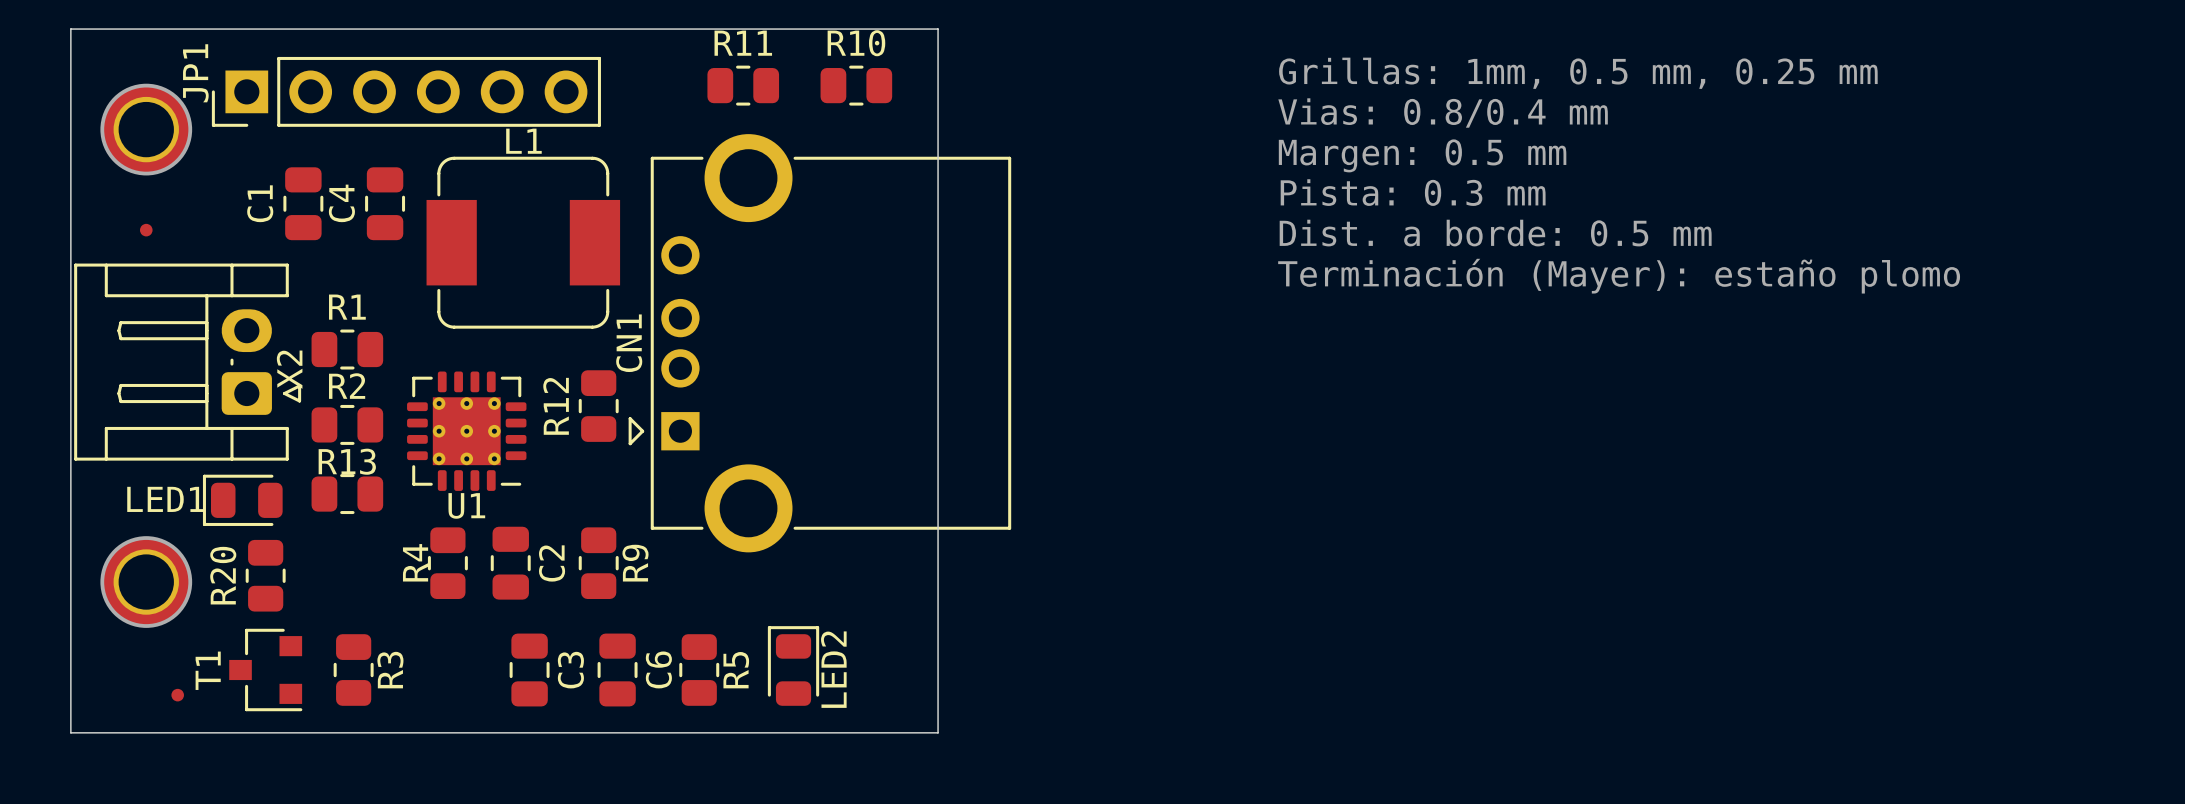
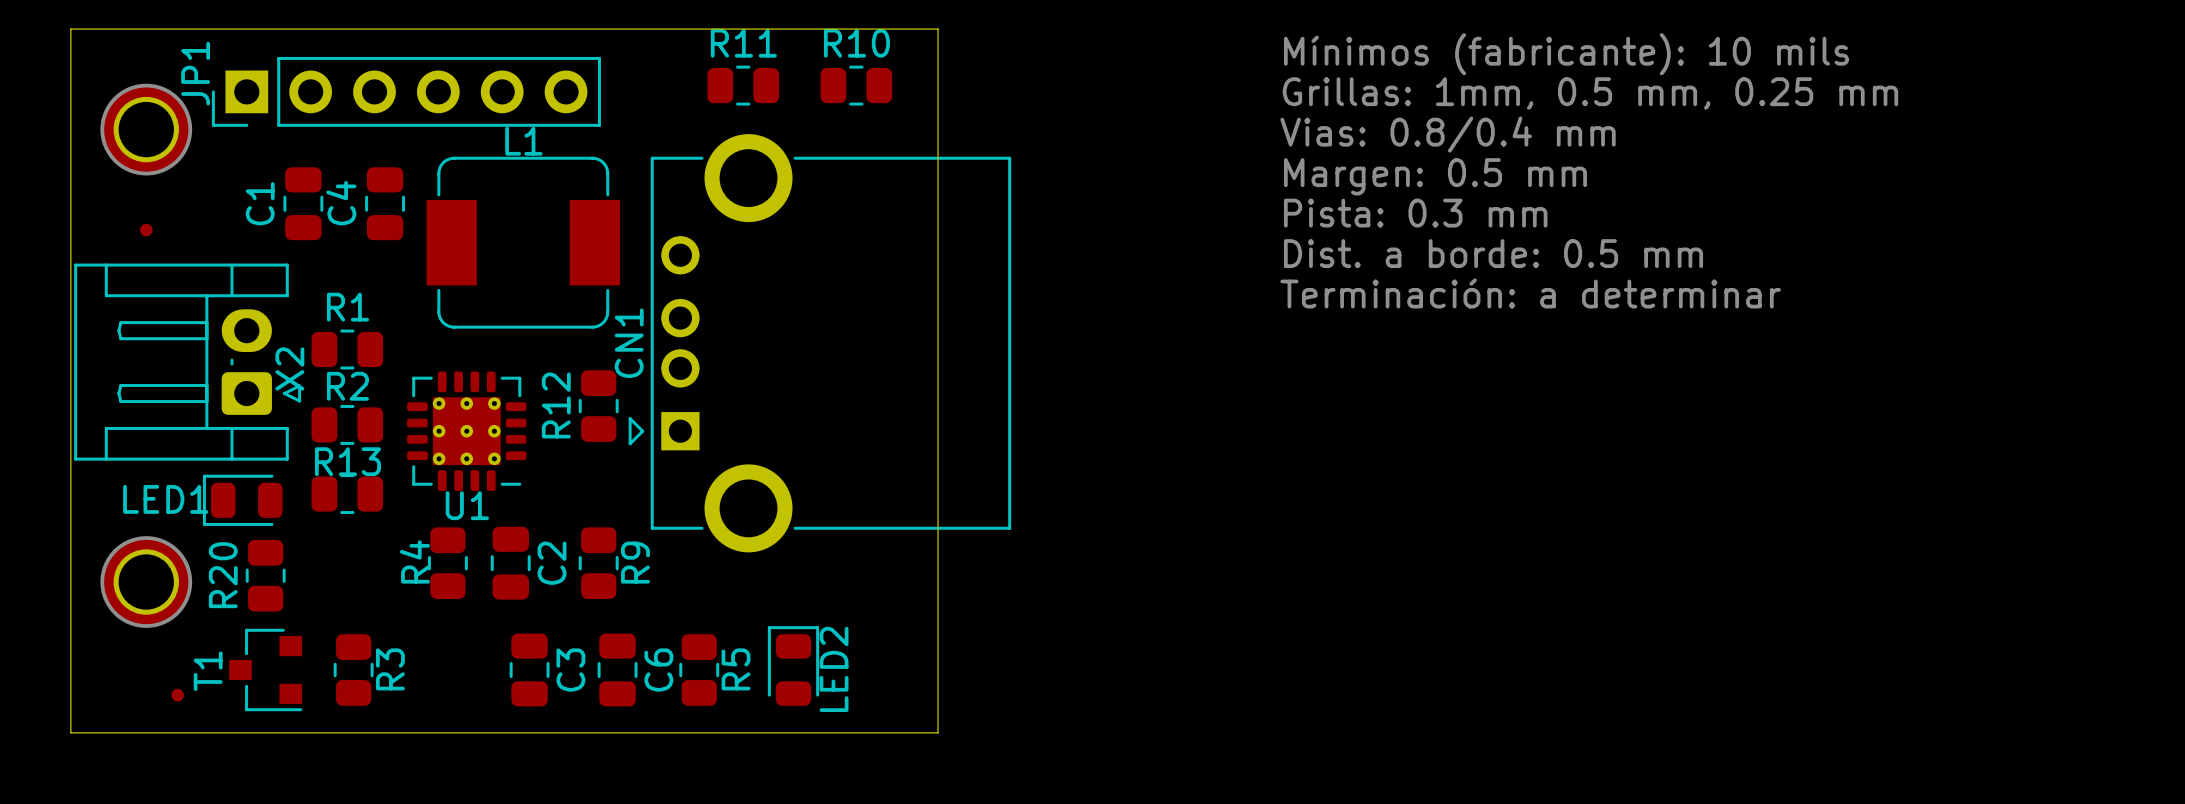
text: none -> Mínimos (fabricante): 10 mils (1566, 54)
text position: Grillas: 1mm, 0.5 mm, 0.25 mm (1578, 73) -> Grillas: 1mm, 0.5 mm, 0.25 mm (1590, 93)
text position: Vias: 0.8/0.4 mm (1443, 113) -> Vias: 0.8/0.4 mm (1448, 134)
text position: Margen: 0.5 mm (1422, 155) -> Margen: 0.5 mm (1435, 176)
text position: Pista: 0.3 mm (1413, 192) -> Pista: 0.3 mm (1415, 213)
text position: Dist. a borde: 0.5 mm (1495, 233) -> Dist. a borde: 0.5 mm (1493, 253)
text: Terminación (Mayer): estaño plomo (1619, 276) -> Terminación: a determinar (1530, 293)

